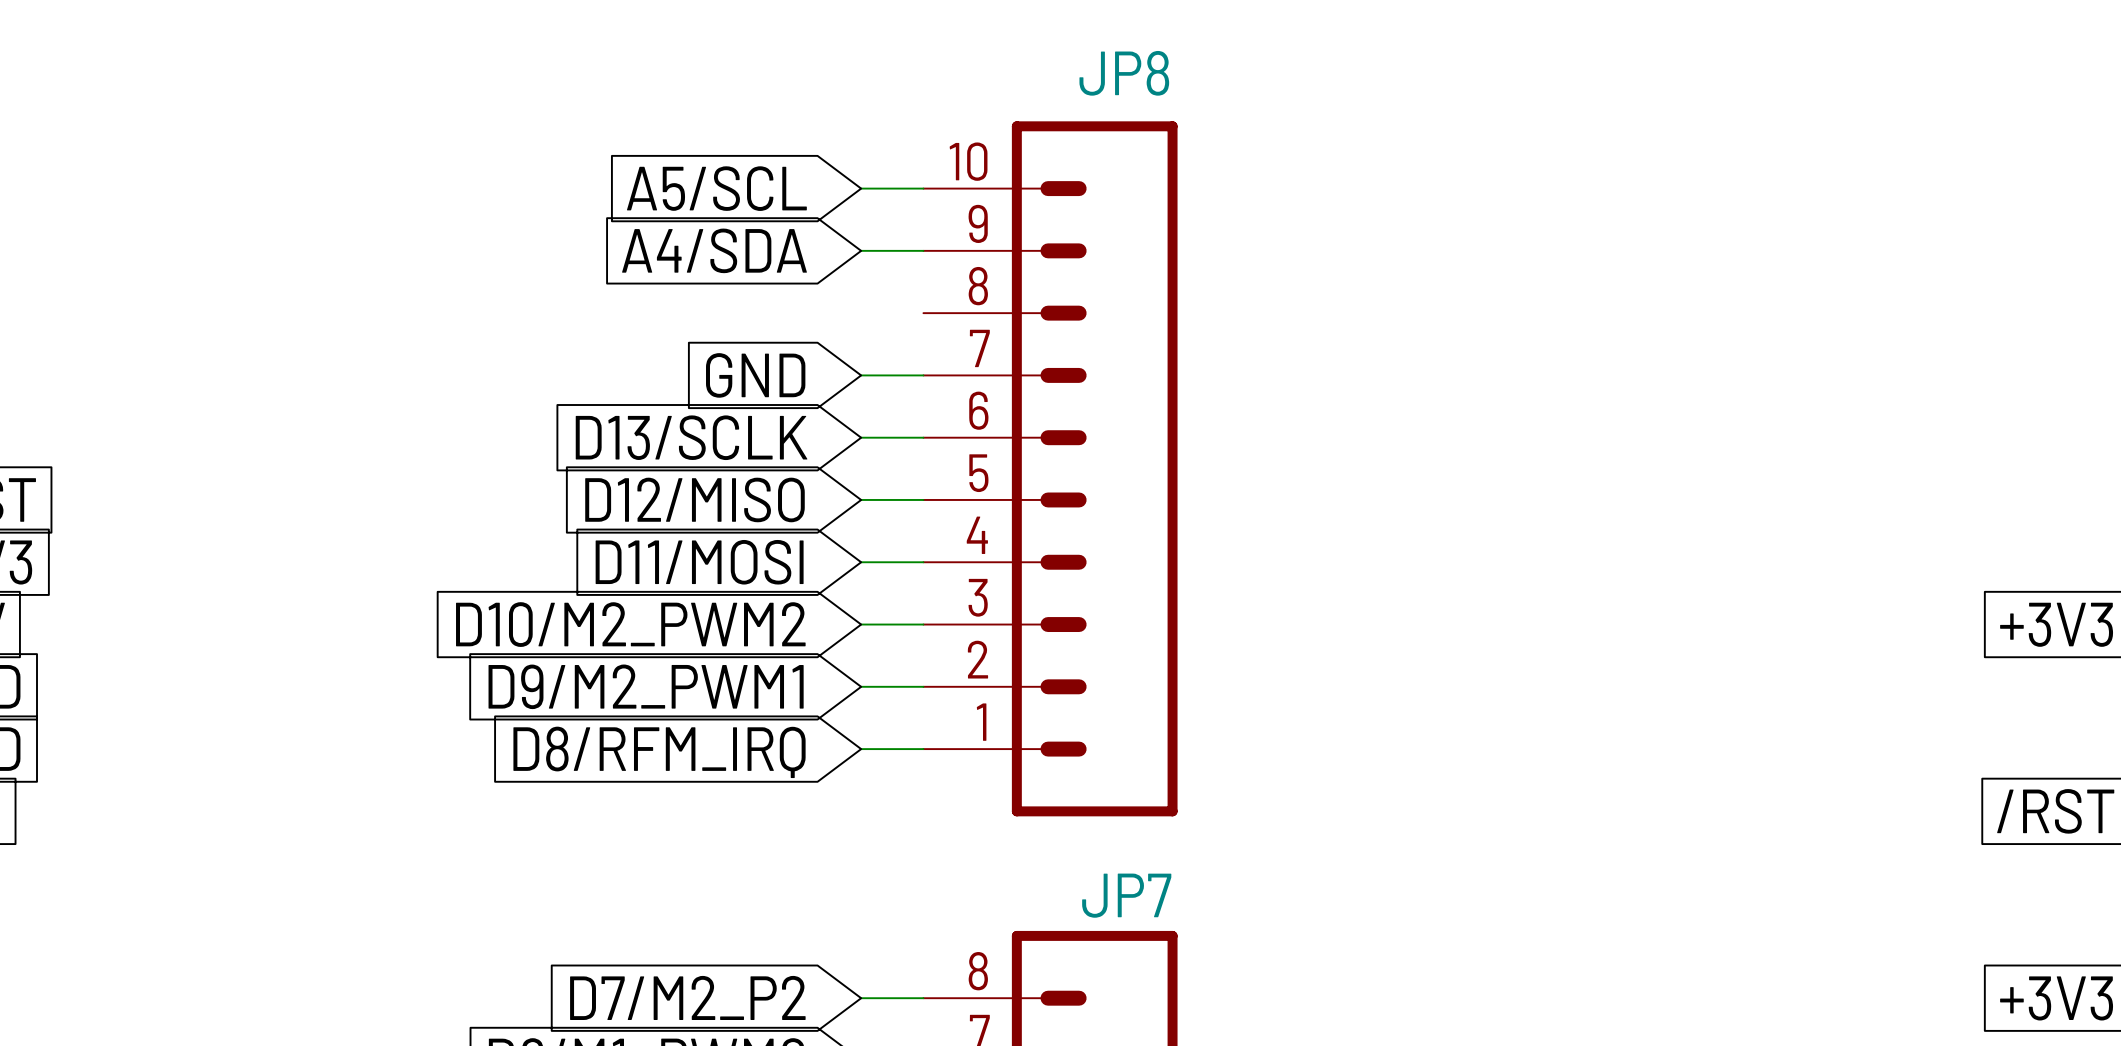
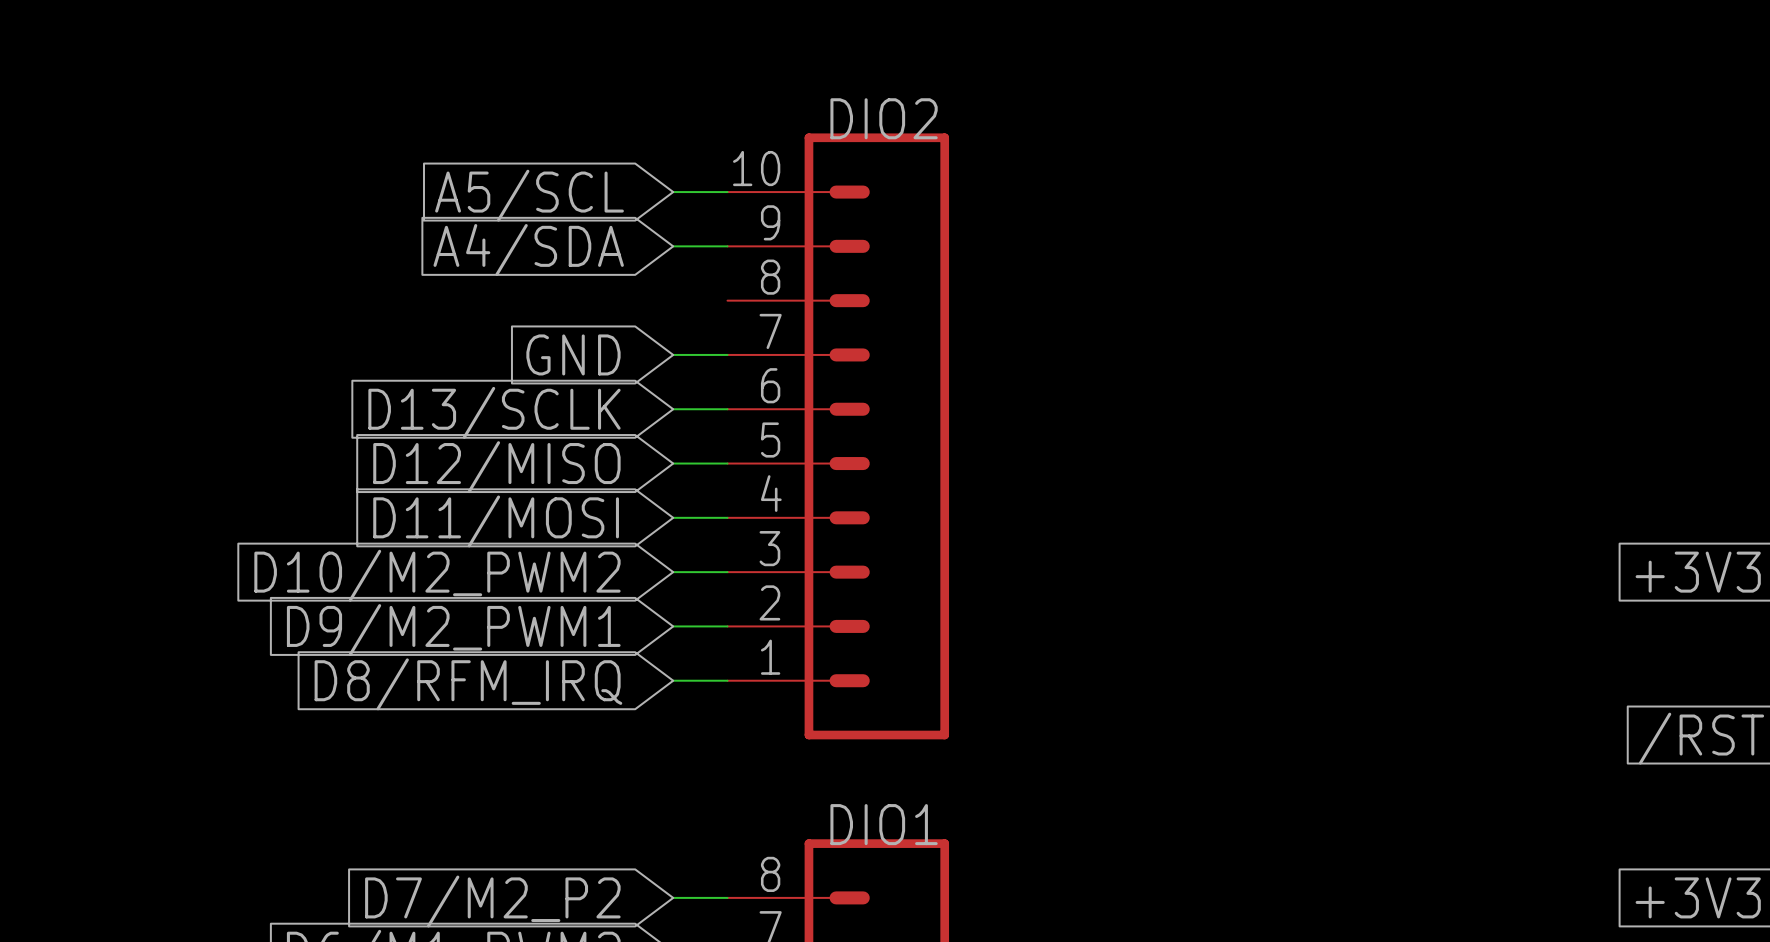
JP8 name: JP8 (1124, 73) -> DIO2 (884, 118)
JP7 name: JP7 (1126, 895) -> DIO1 (884, 824)

